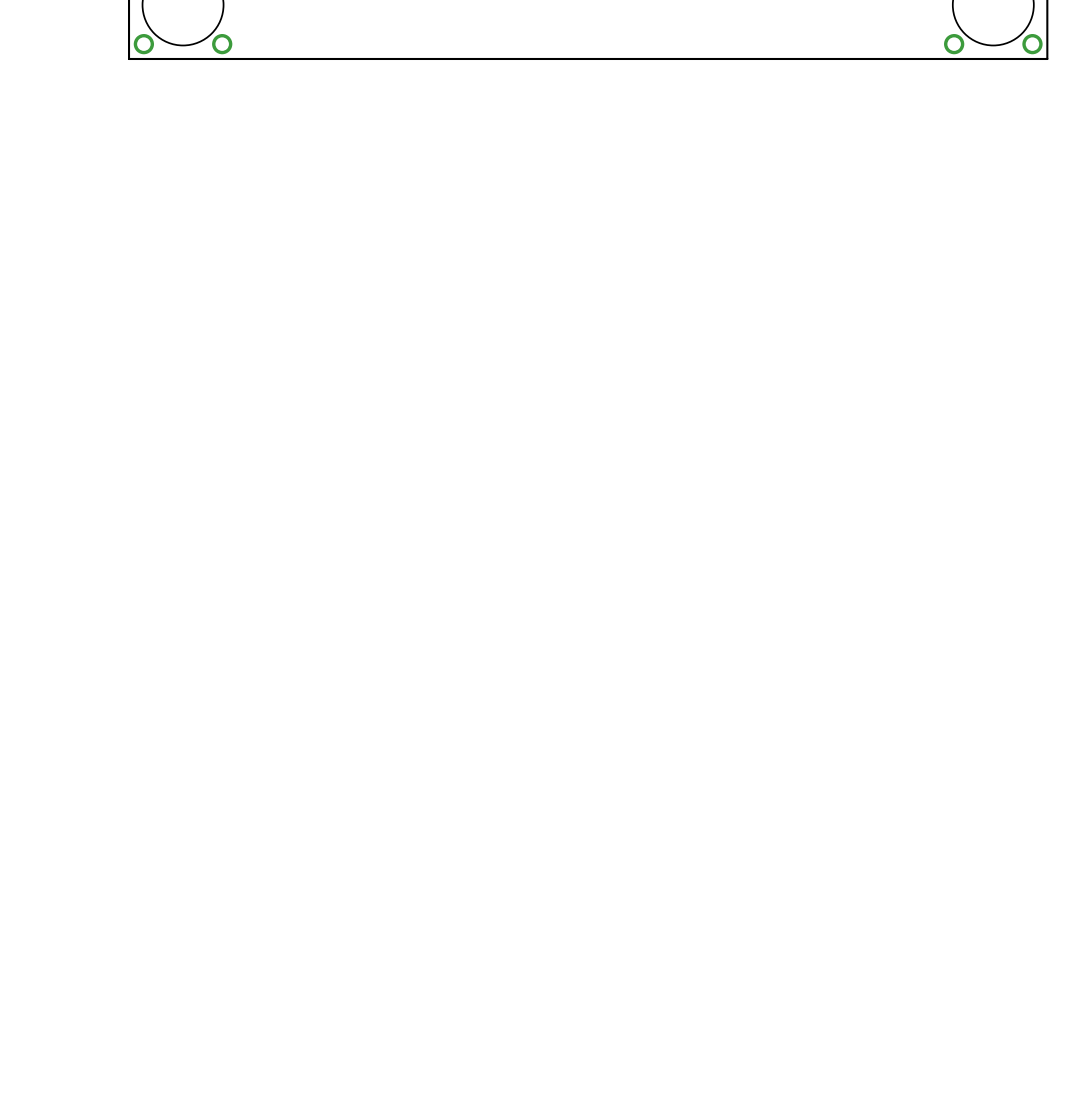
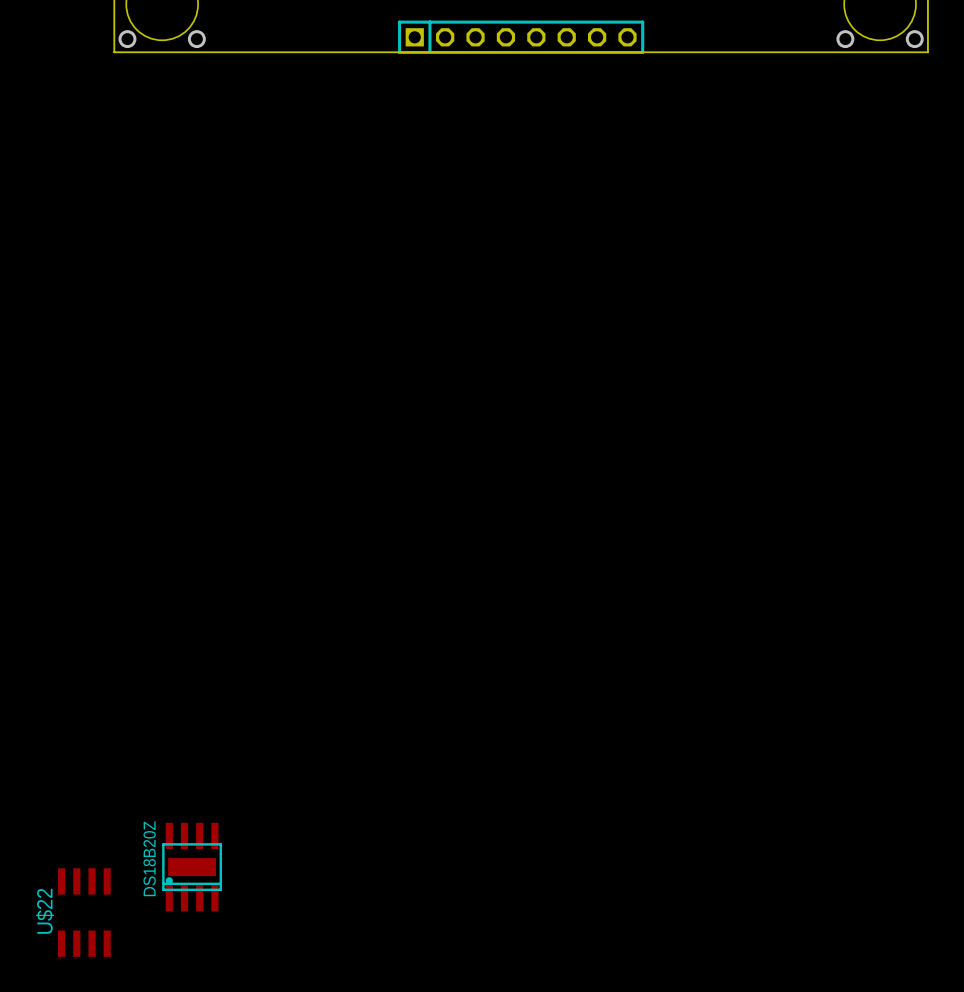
part: none -> (521, 37)
DS18B20Z: none -> (192, 867)
U$22: none -> (84, 912)

